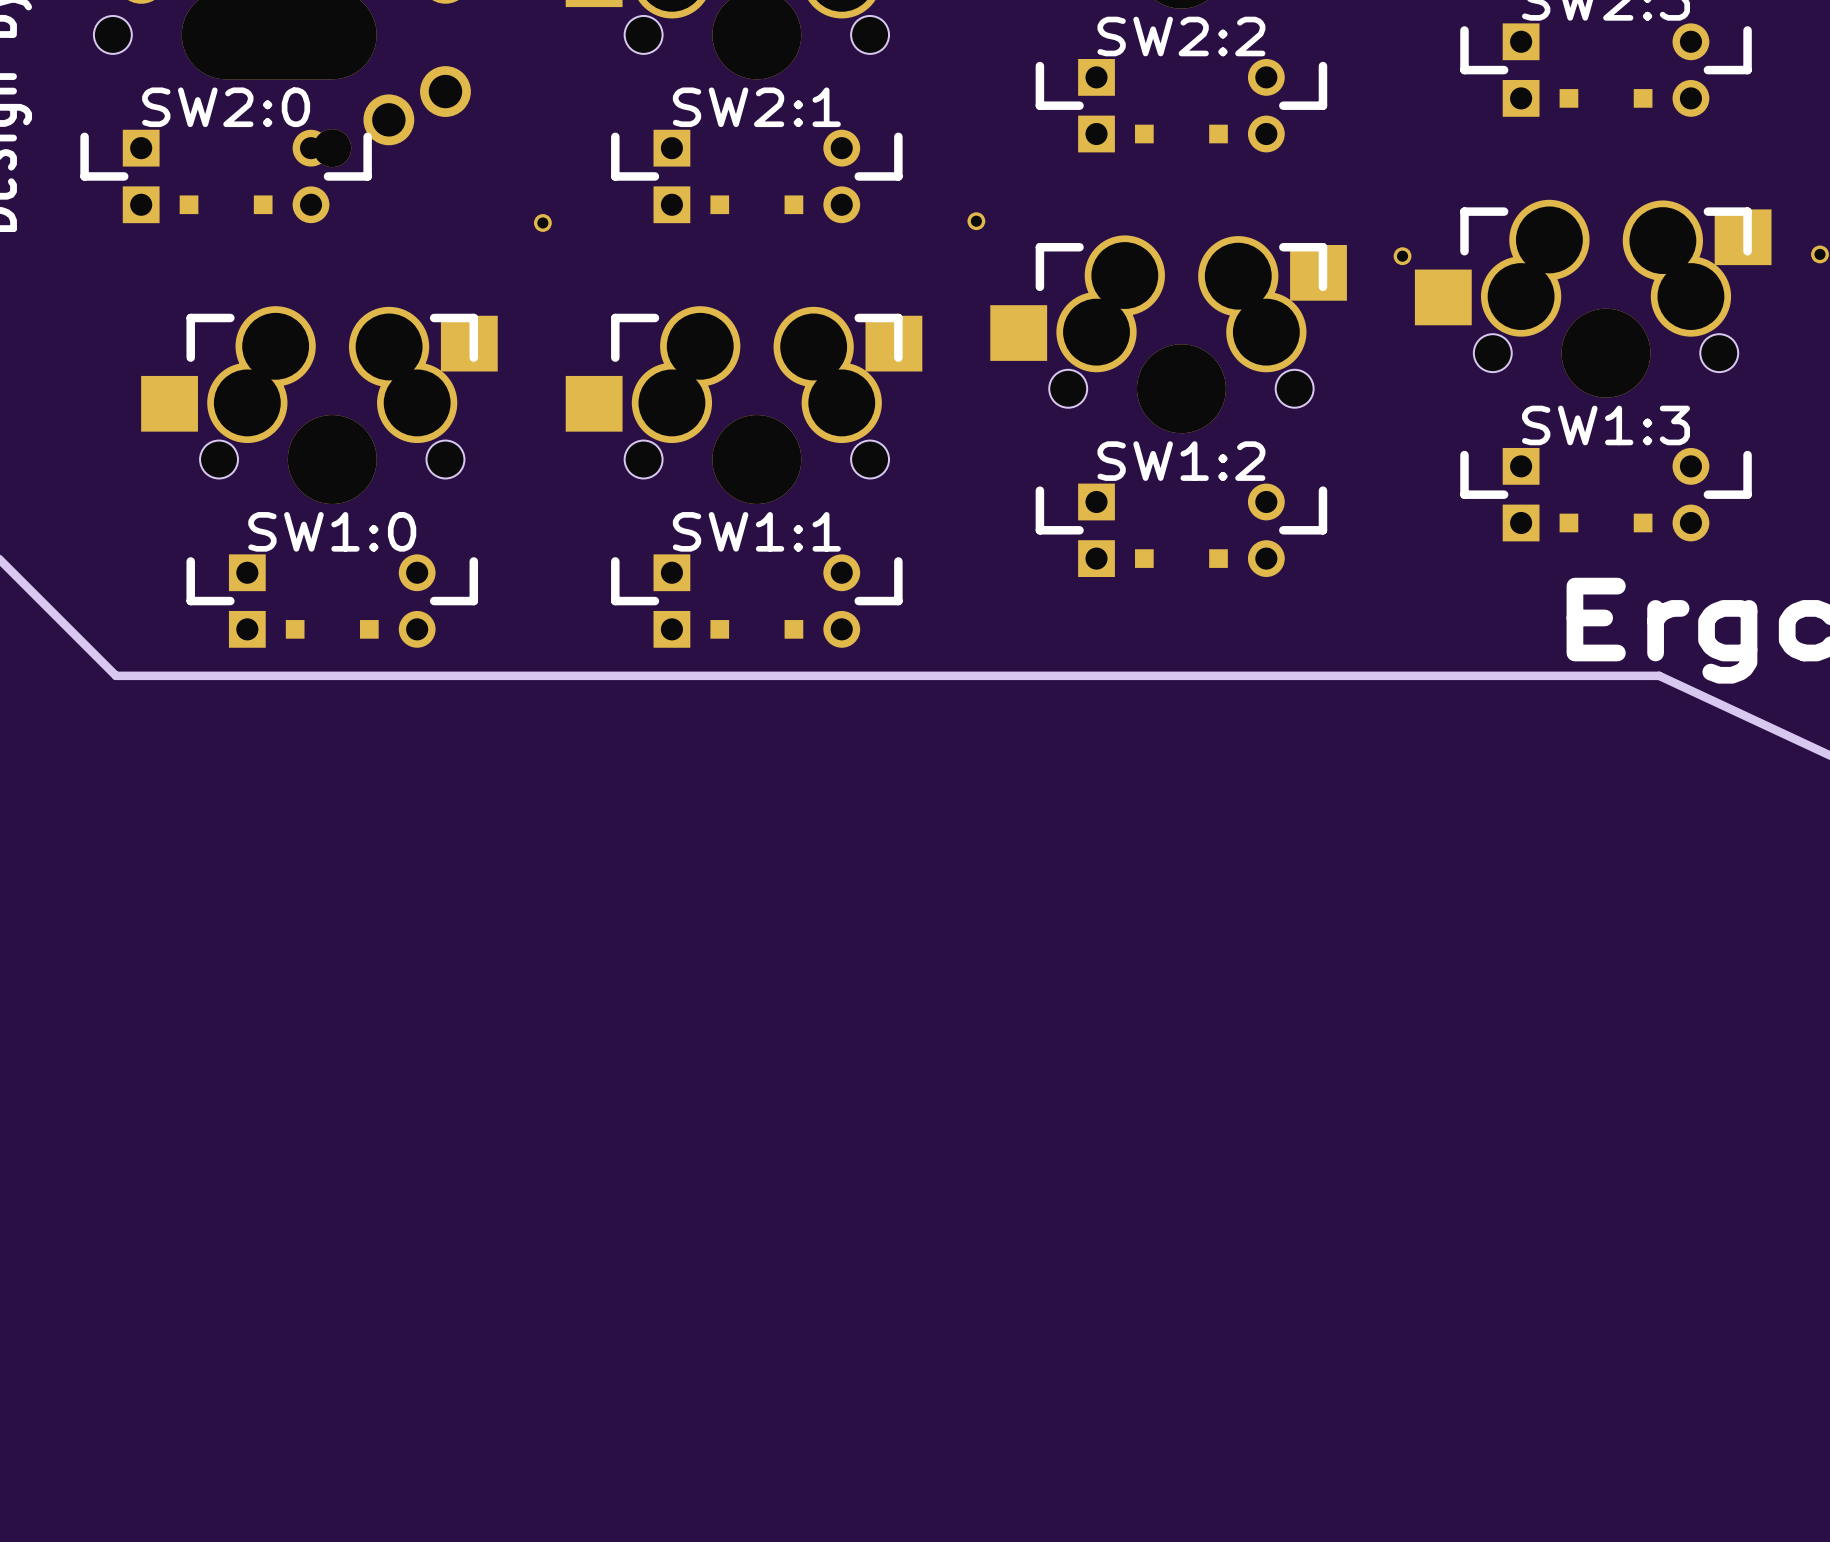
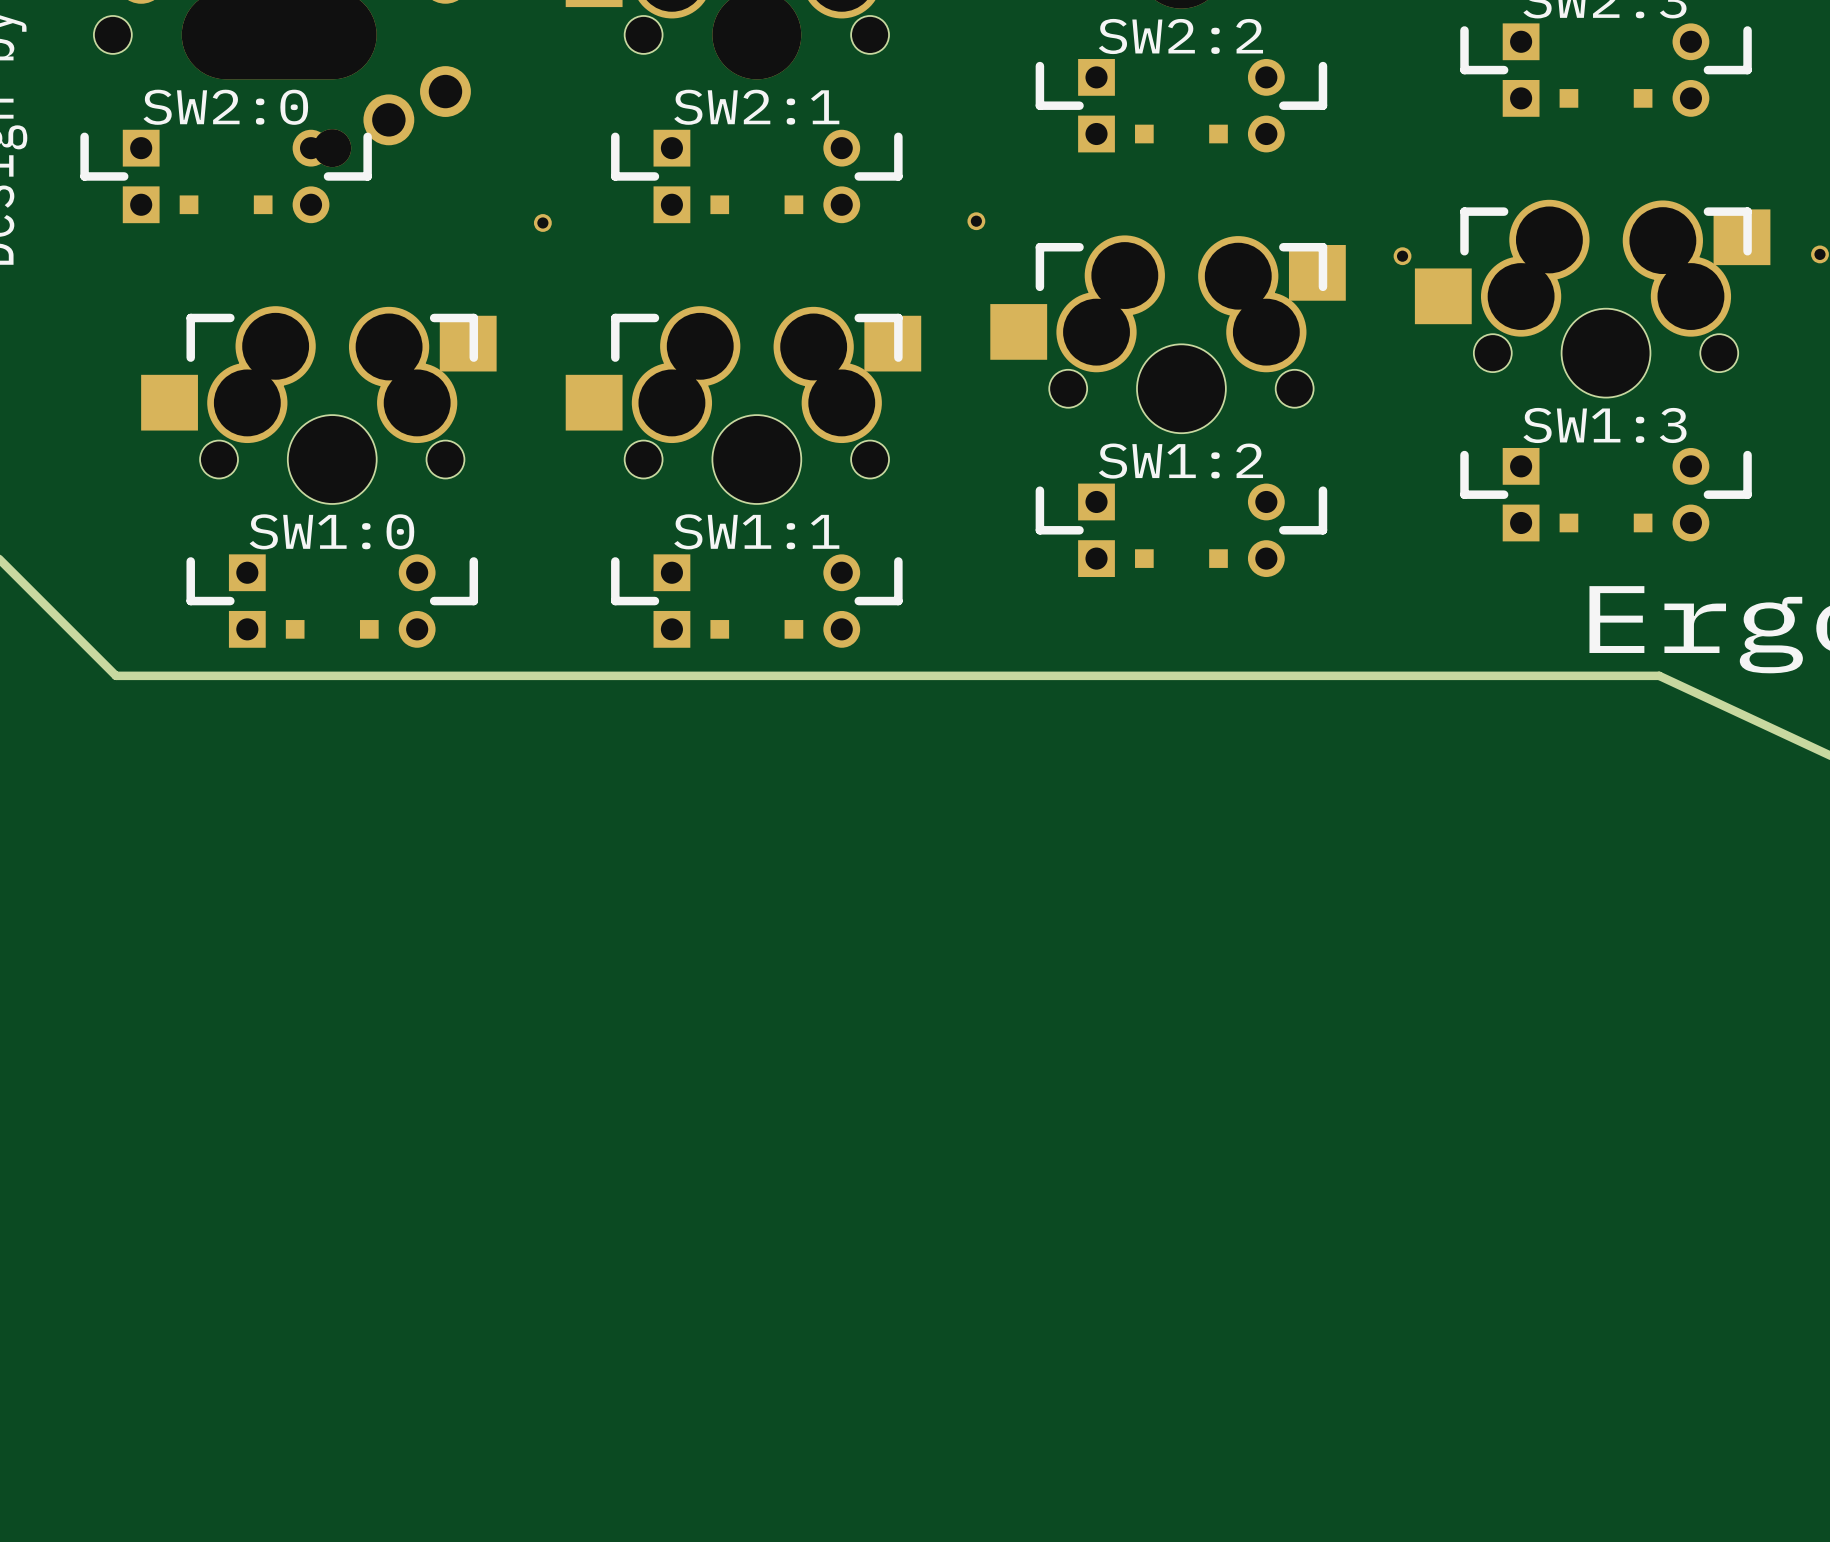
part footprint: [1414, 199, 1772, 542] -> [1414, 199, 1771, 542]
part footprint: [990, 235, 1347, 577] -> [990, 235, 1346, 577]
part footprint: [141, 306, 498, 648] -> [141, 306, 497, 648]
part footprint: [565, 306, 923, 648] -> [565, 306, 922, 648]

